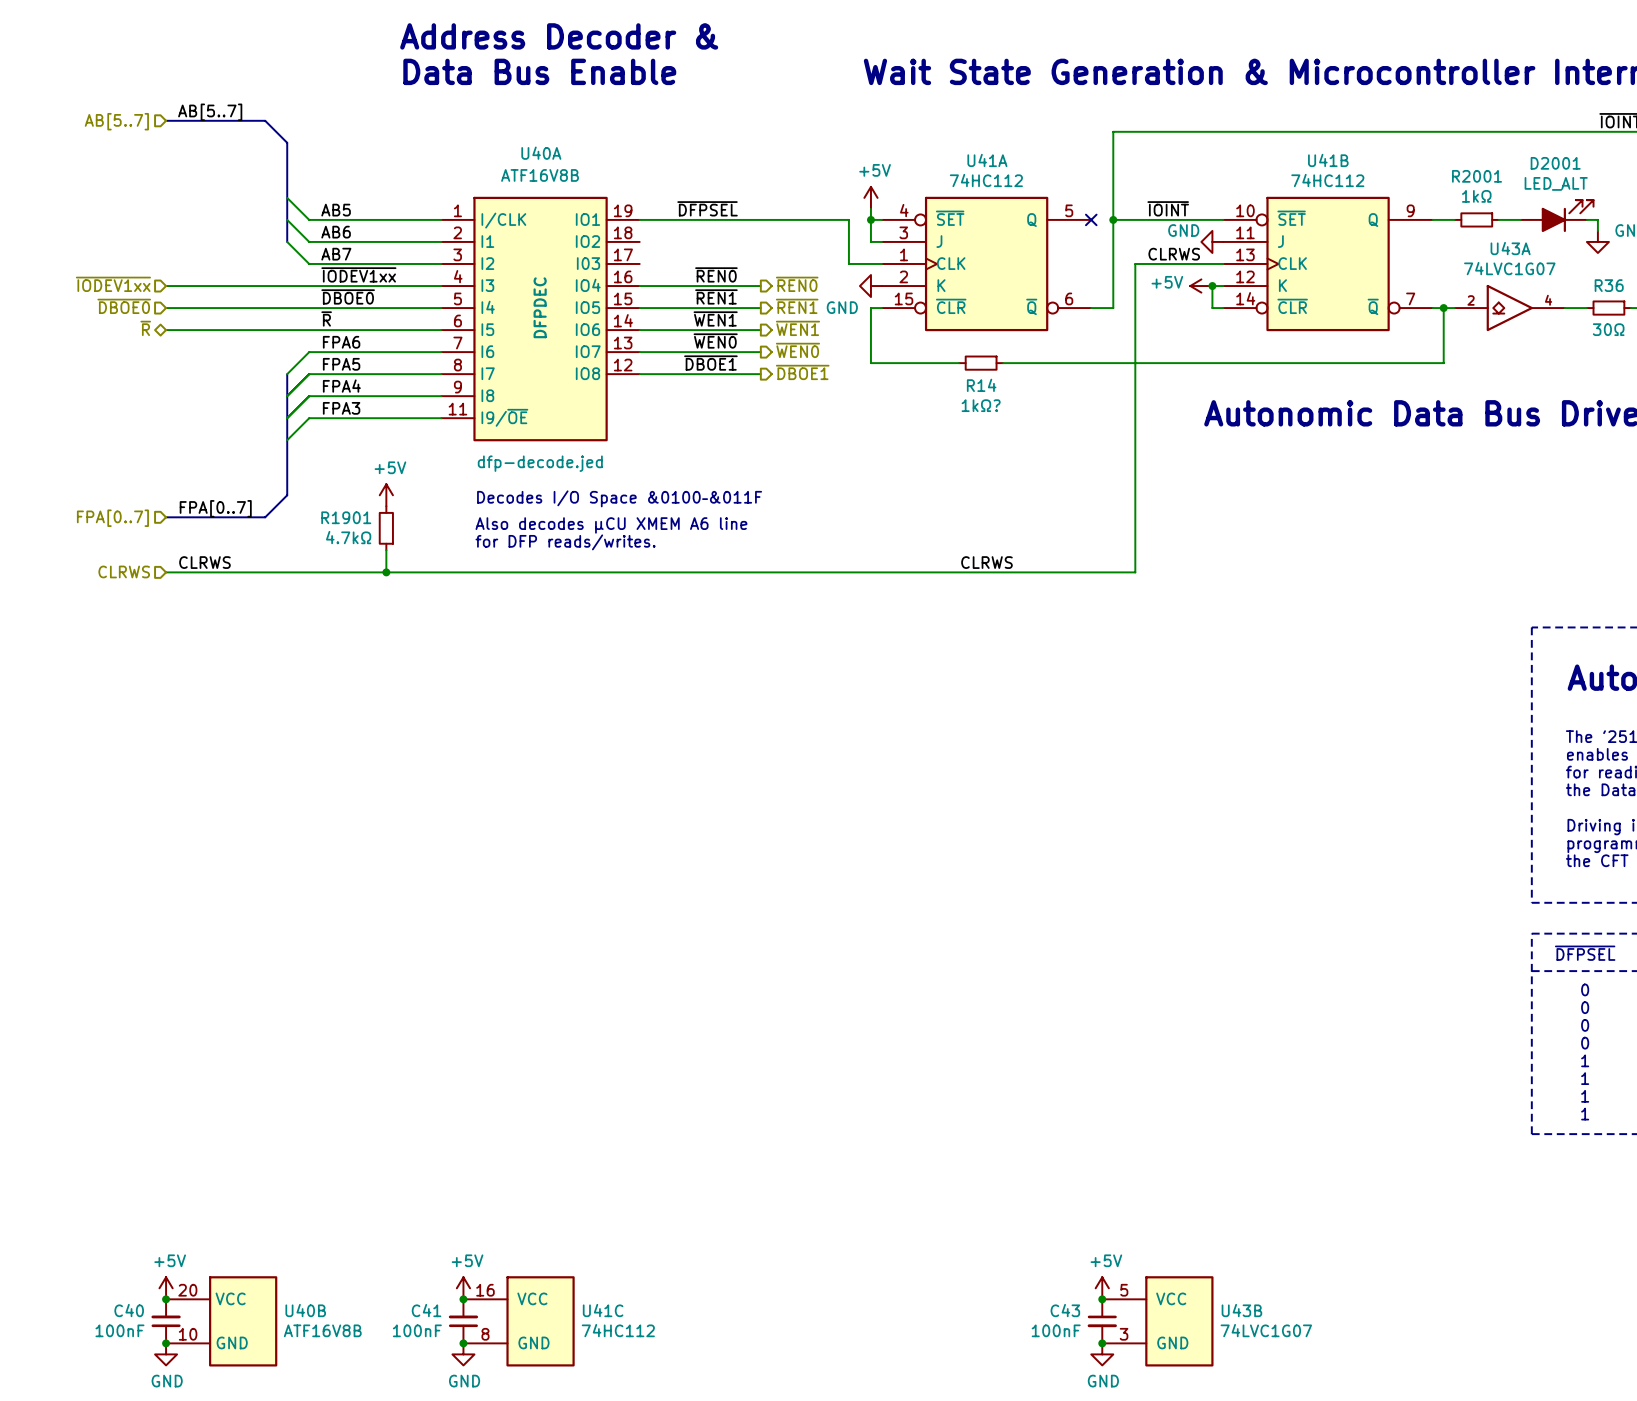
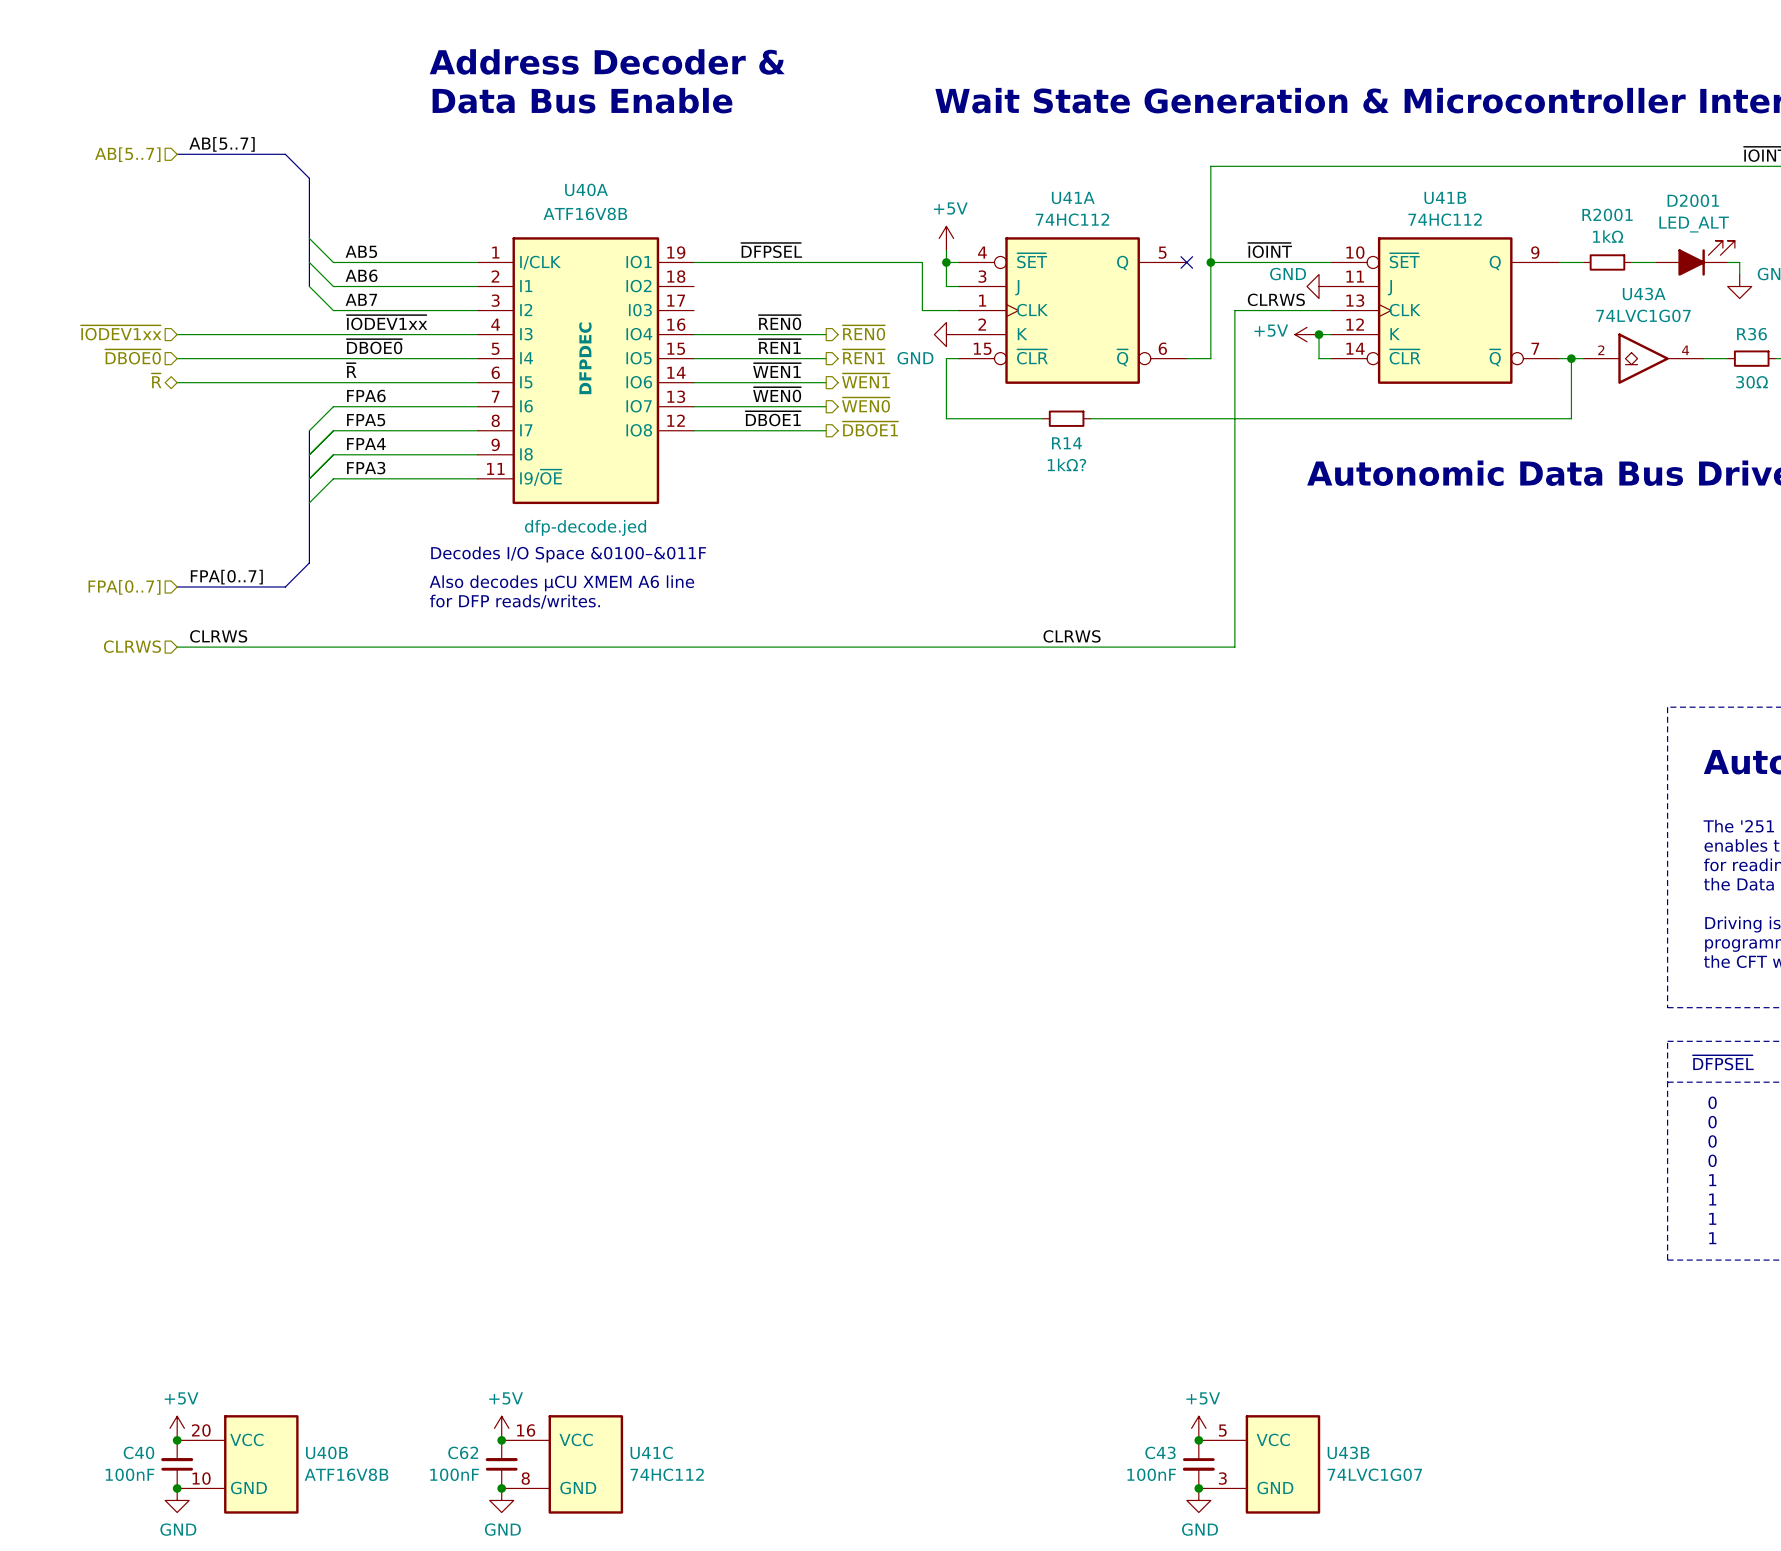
power symbol: +5V (386, 495) -> none
text position: Decodes I/O Space &0100–&011F (619, 498) -> Decodes I/O Space &0100–&011F (568, 554)
text position: Also decodes µCU XMEM A6 line (611, 525) -> Also decodes µCU XMEM A6 line (561, 583)
R1901: 4.7kΩ (386, 528) -> none
text position: for DFP reads/writes. (565, 542) -> for DFP reads/writes. (514, 601)
wire: (386, 550) (386, 572) -> none
junction: (386, 572) -> none
C41 name: C41 (426, 1310) -> C62 (463, 1452)

